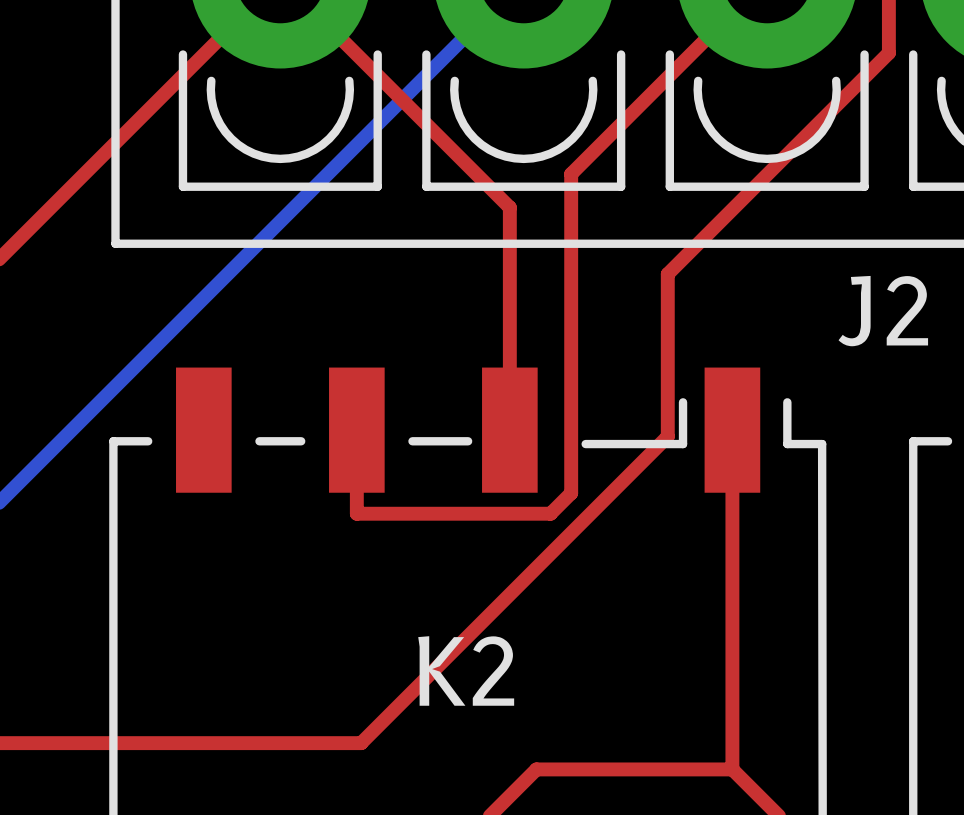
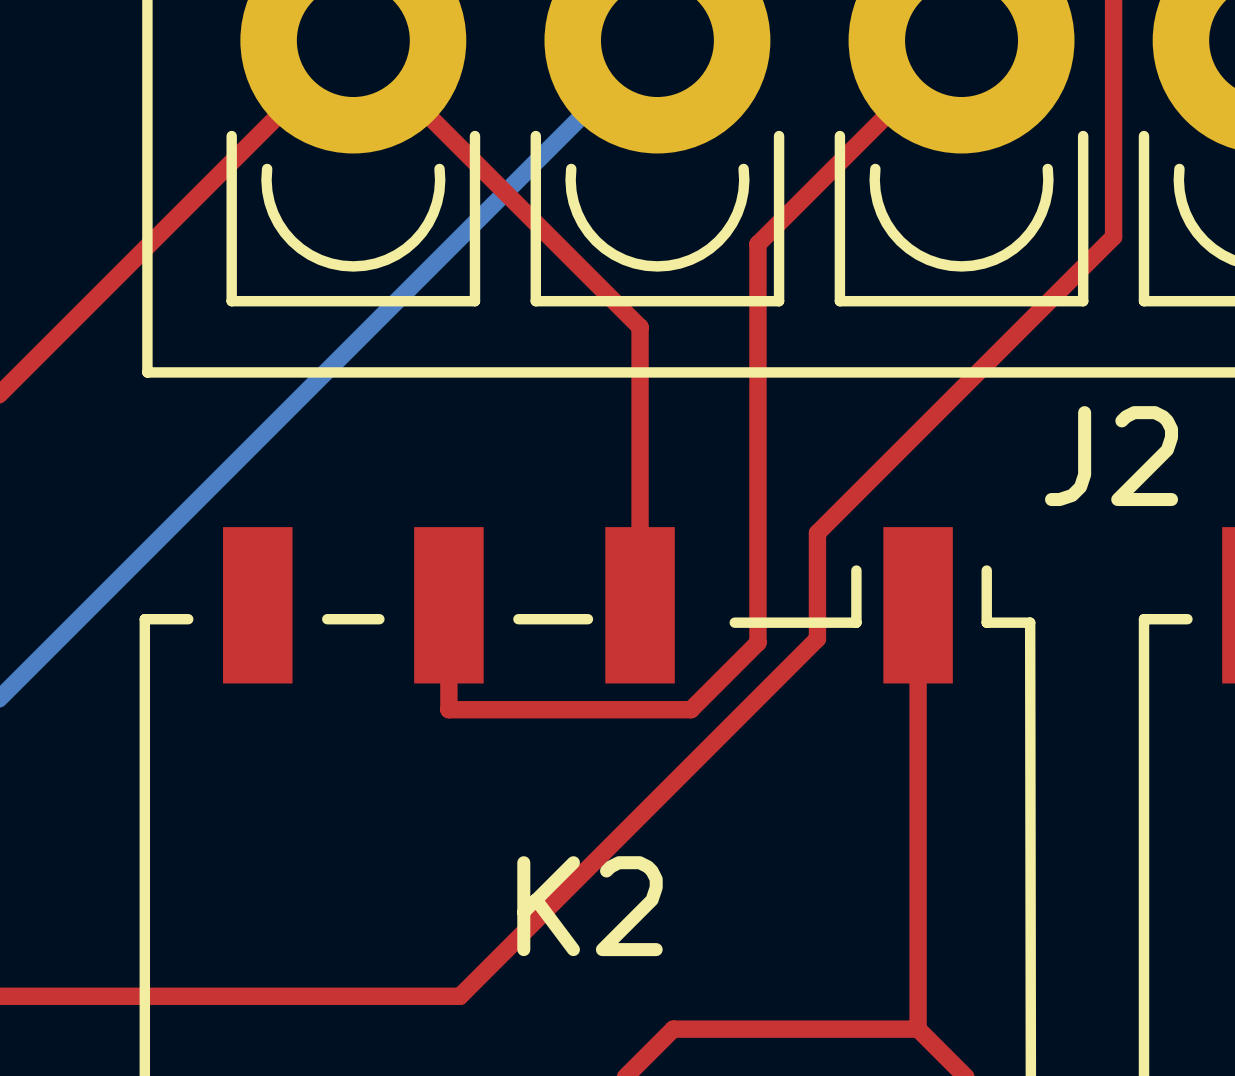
top track: (888, 53) (667, 274) (667, 436) (361, 743) -> (1113, 134) (1113, 236) (817, 533) (817, 638) (460, 996) (454, 996)
top track: (604, 141) (571, 174) (571, 493) -> (757, 244) (757, 642) (716, 684)

